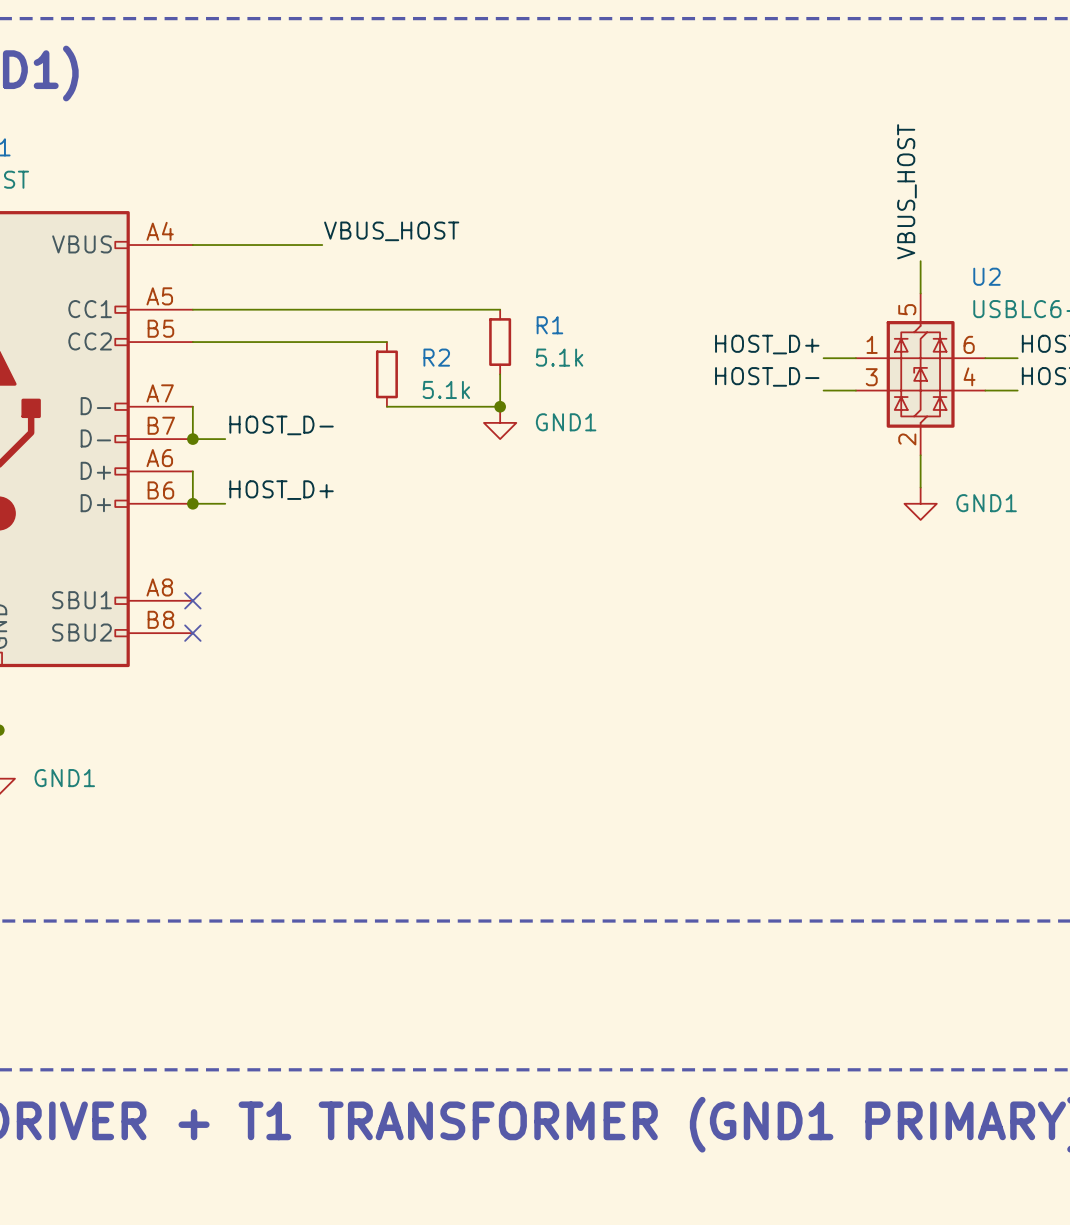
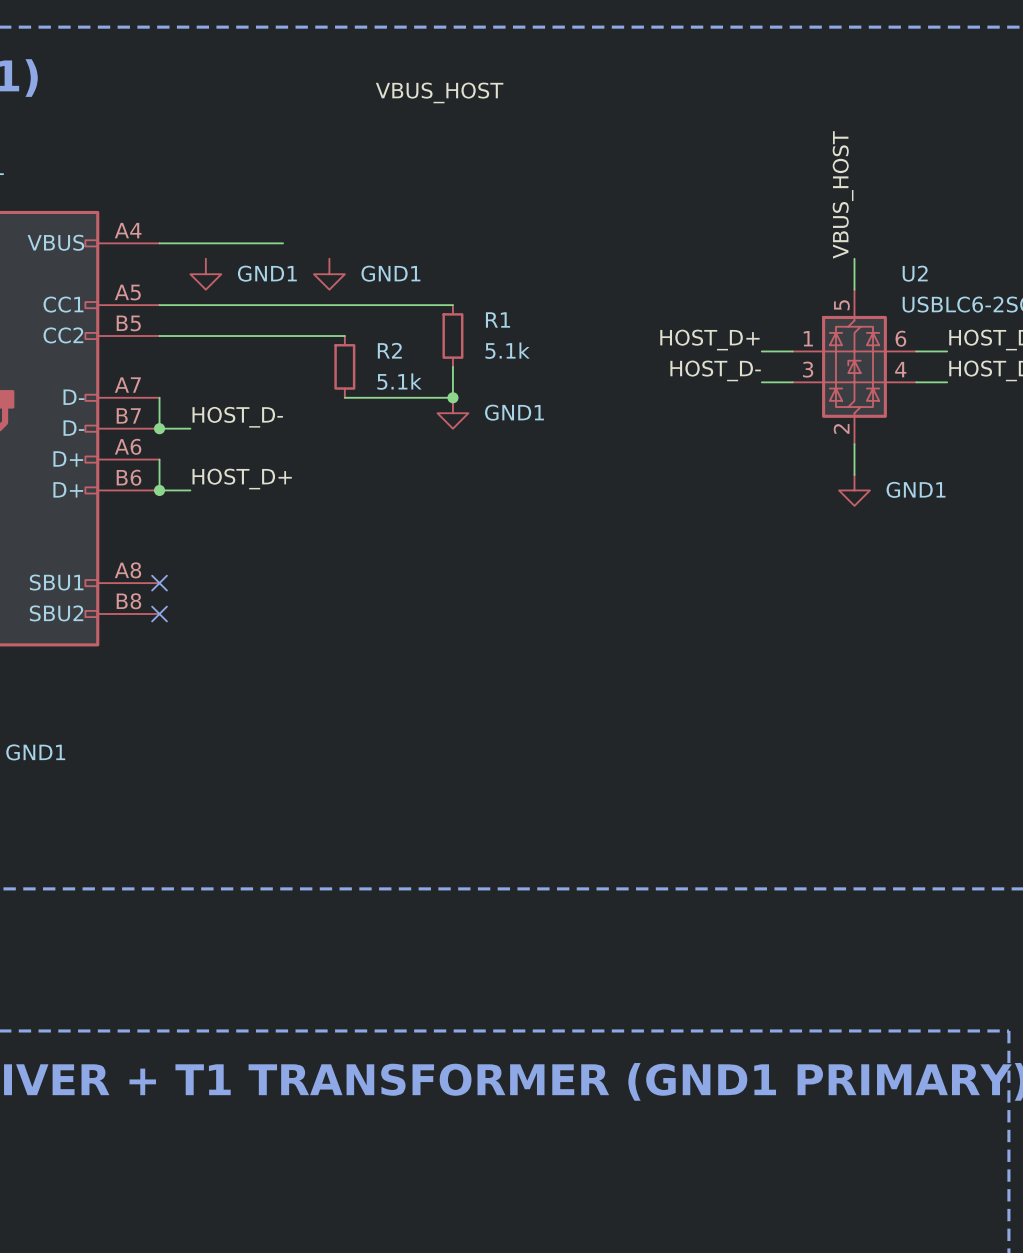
label position: VBUS_HOST (391, 231) -> VBUS_HOST (439, 92)
power symbol: none -> GND1 (205, 274)
power symbol: none -> GND1 (329, 274)

